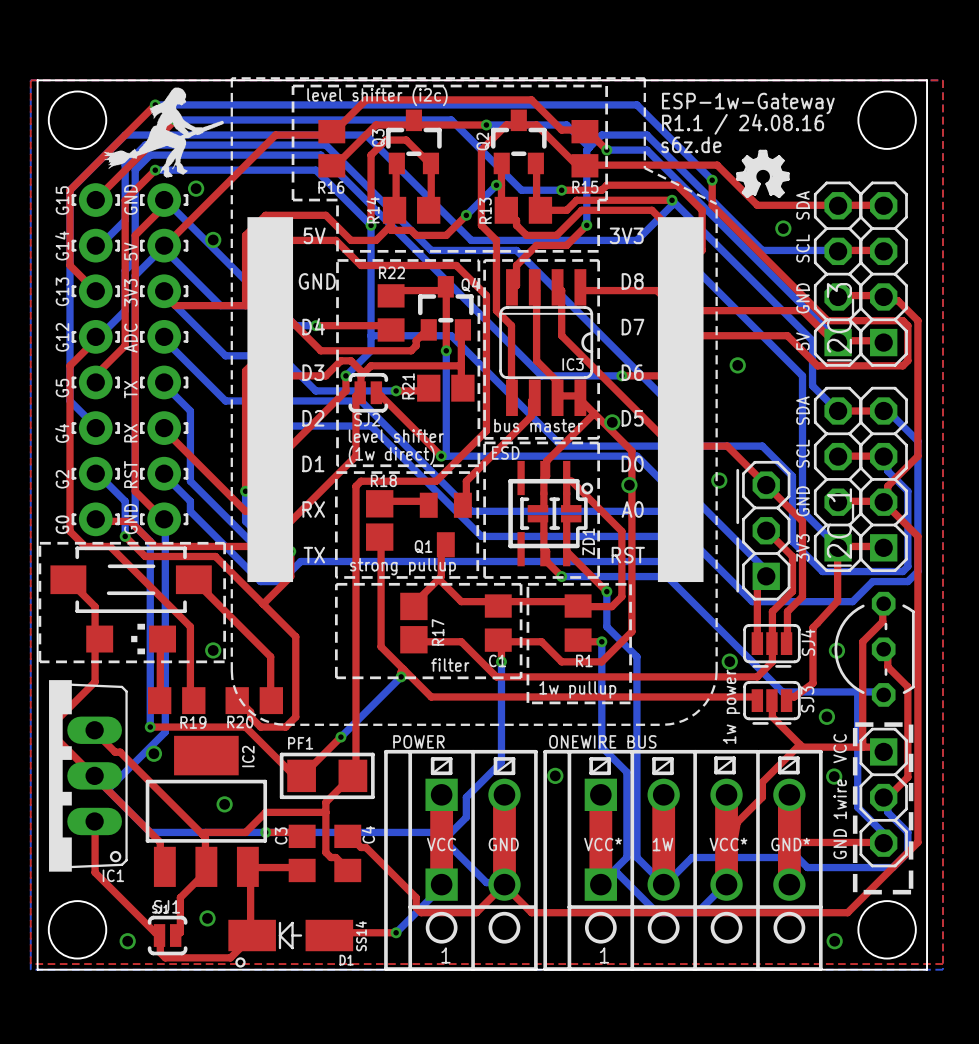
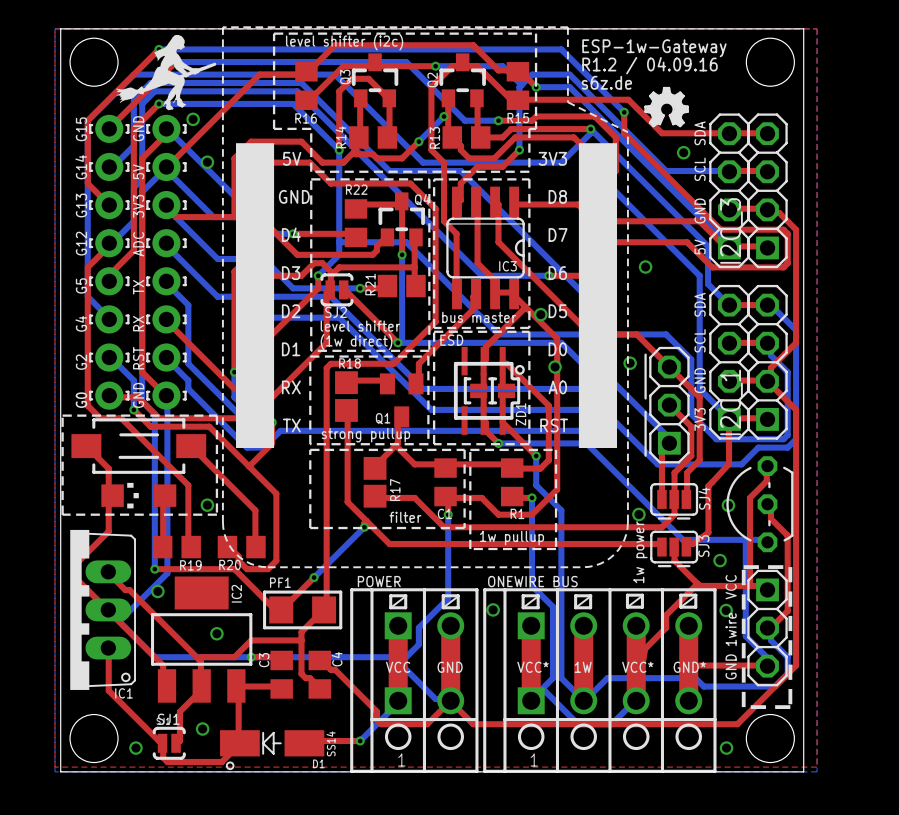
text: R1.1 / 24.08.16 (743, 124) -> R1.2 / 04.09.16 (650, 65)
part rotation: 0° (131, 639) -> 180° (138, 495)

